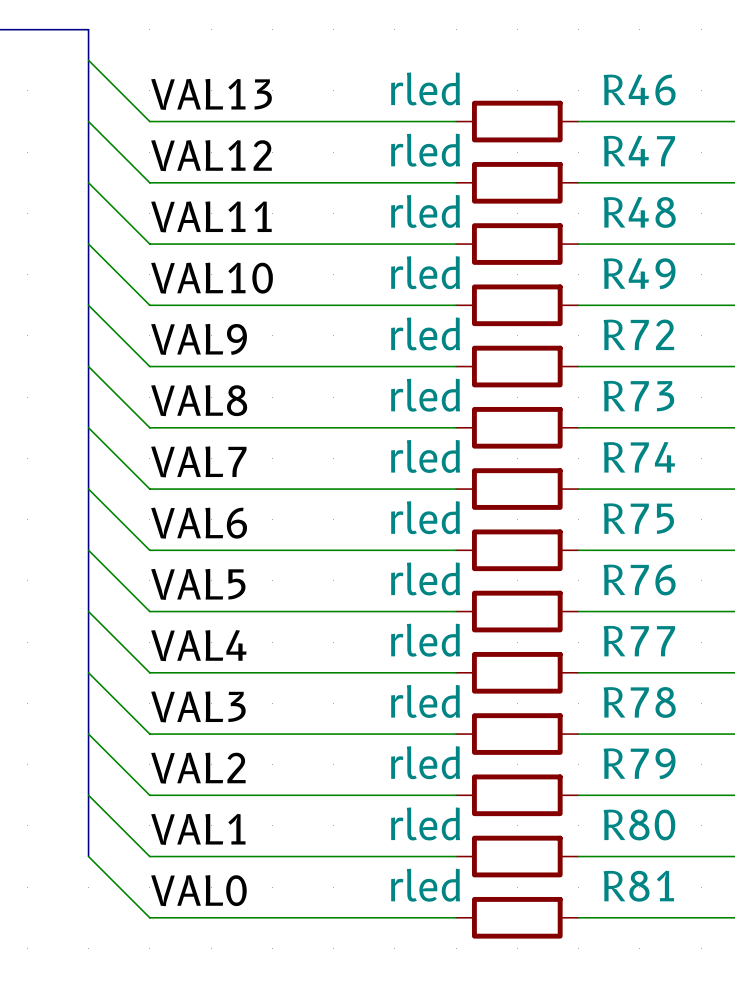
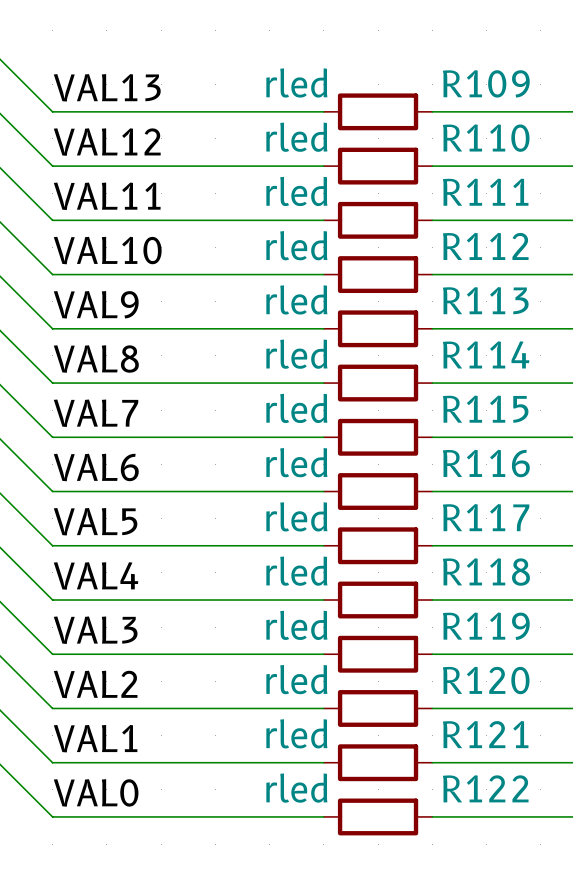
R46 name: R46 (639, 89) -> R109 (486, 83)
R47 name: R47 (639, 151) -> R110 (486, 138)
R48 name: R48 (639, 212) -> R111 (485, 192)
R49 name: R49 (639, 273) -> R112 (485, 246)
R72 name: R72 (638, 334) -> R113 (485, 300)
R73 name: R73 (638, 396) -> R114 (486, 354)
R74 name: R74 (639, 457) -> R115 (485, 409)
R75 name: R75 (638, 518) -> R116 (486, 463)
R76 name: R76 (639, 579) -> R117 (486, 517)
R77 name: R77 (639, 641) -> R118 (486, 572)
R78 name: R78 (639, 702) -> R119 (486, 626)
R79 name: R79 (639, 763) -> R120 (486, 680)
R80 name: R80 (639, 824) -> R121 (485, 734)
R81 name: R81 (638, 886) -> R122 (485, 788)

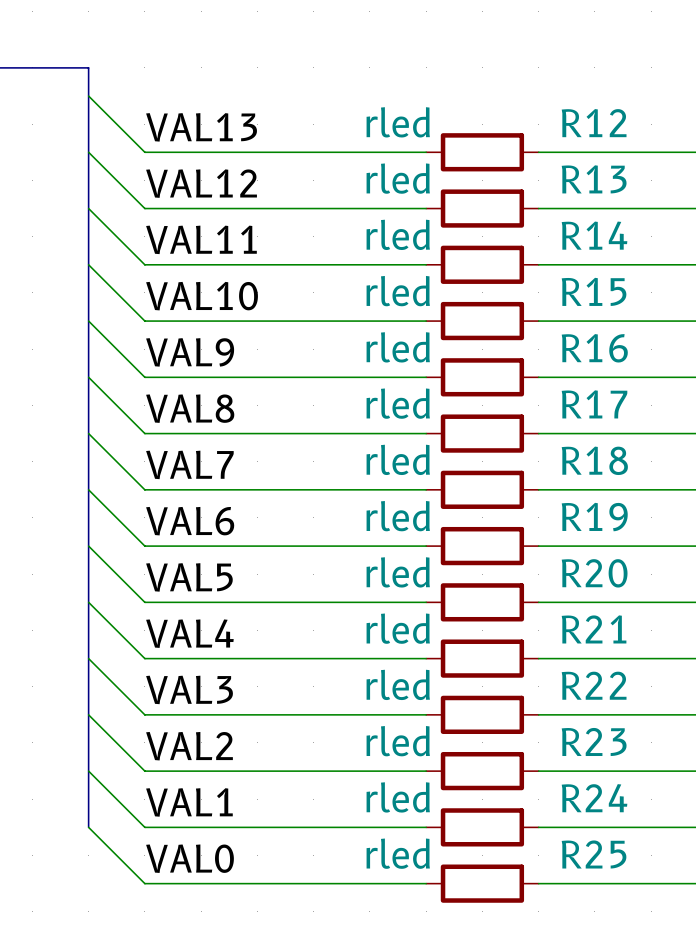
R109 name: R109 (486, 83) -> R12 (594, 123)
R110 name: R110 (486, 138) -> R13 (594, 179)
R111 name: R111 (485, 192) -> R14 (594, 235)
R112 name: R112 (485, 246) -> R15 (594, 291)
R113 name: R113 (485, 300) -> R16 (594, 348)
R114 name: R114 (486, 354) -> R17 (594, 404)
R115 name: R115 (485, 409) -> R18 (594, 460)
R116 name: R116 (486, 463) -> R19 (594, 517)
R117 name: R117 (486, 517) -> R20 (594, 573)
R118 name: R118 (486, 572) -> R21 (594, 629)
R119 name: R119 (486, 626) -> R22 (594, 685)
R120 name: R120 (486, 680) -> R23 (594, 741)
R121 name: R121 (485, 734) -> R24 (594, 798)
R122 name: R122 (485, 788) -> R25 (594, 854)

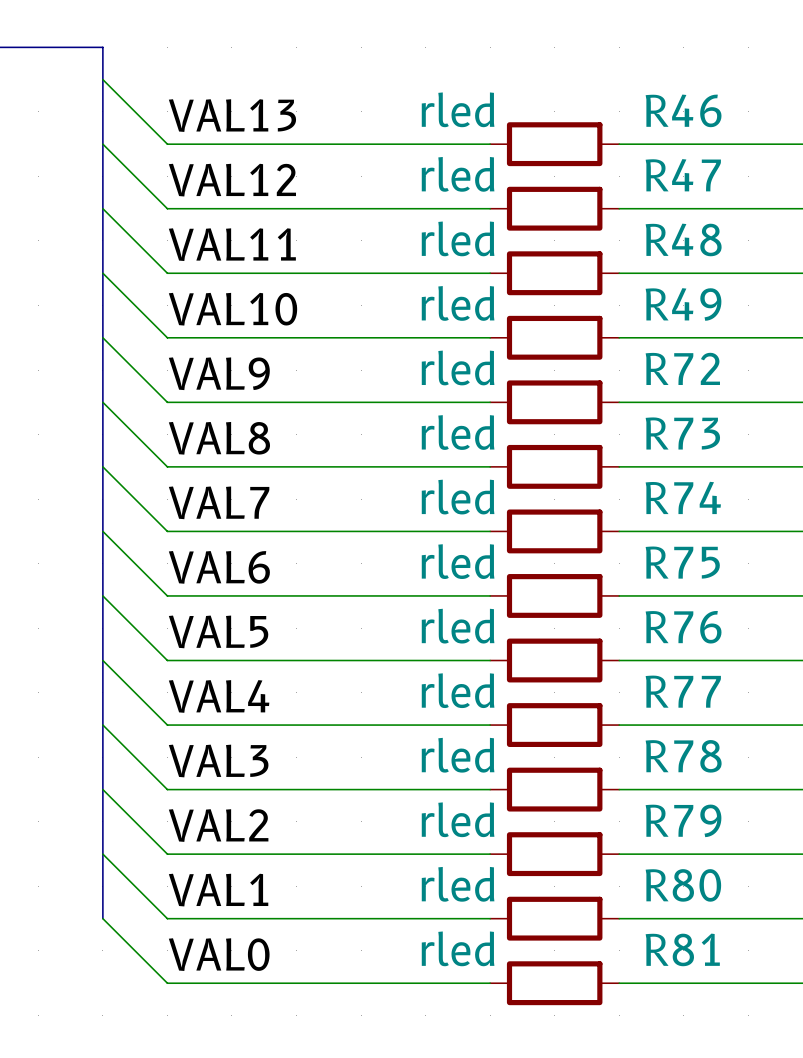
R12 name: R12 (594, 123) -> R46 (683, 110)
R13 name: R13 (594, 179) -> R47 (683, 175)
R14 name: R14 (594, 235) -> R48 (683, 239)
R15 name: R15 (594, 291) -> R49 (683, 304)
R16 name: R16 (594, 348) -> R72 (682, 368)
R17 name: R17 (594, 404) -> R73 (682, 433)
R18 name: R18 (594, 460) -> R74 (683, 497)
R19 name: R19 (594, 517) -> R75 (682, 562)
R20 name: R20 (594, 573) -> R76 (683, 627)
R21 name: R21 (594, 629) -> R77 (683, 691)
R22 name: R22 (594, 685) -> R78 (683, 756)
R23 name: R23 (594, 741) -> R79 (683, 820)
R24 name: R24 (594, 798) -> R80 (683, 885)
R25 name: R25 (594, 854) -> R81 (682, 949)

